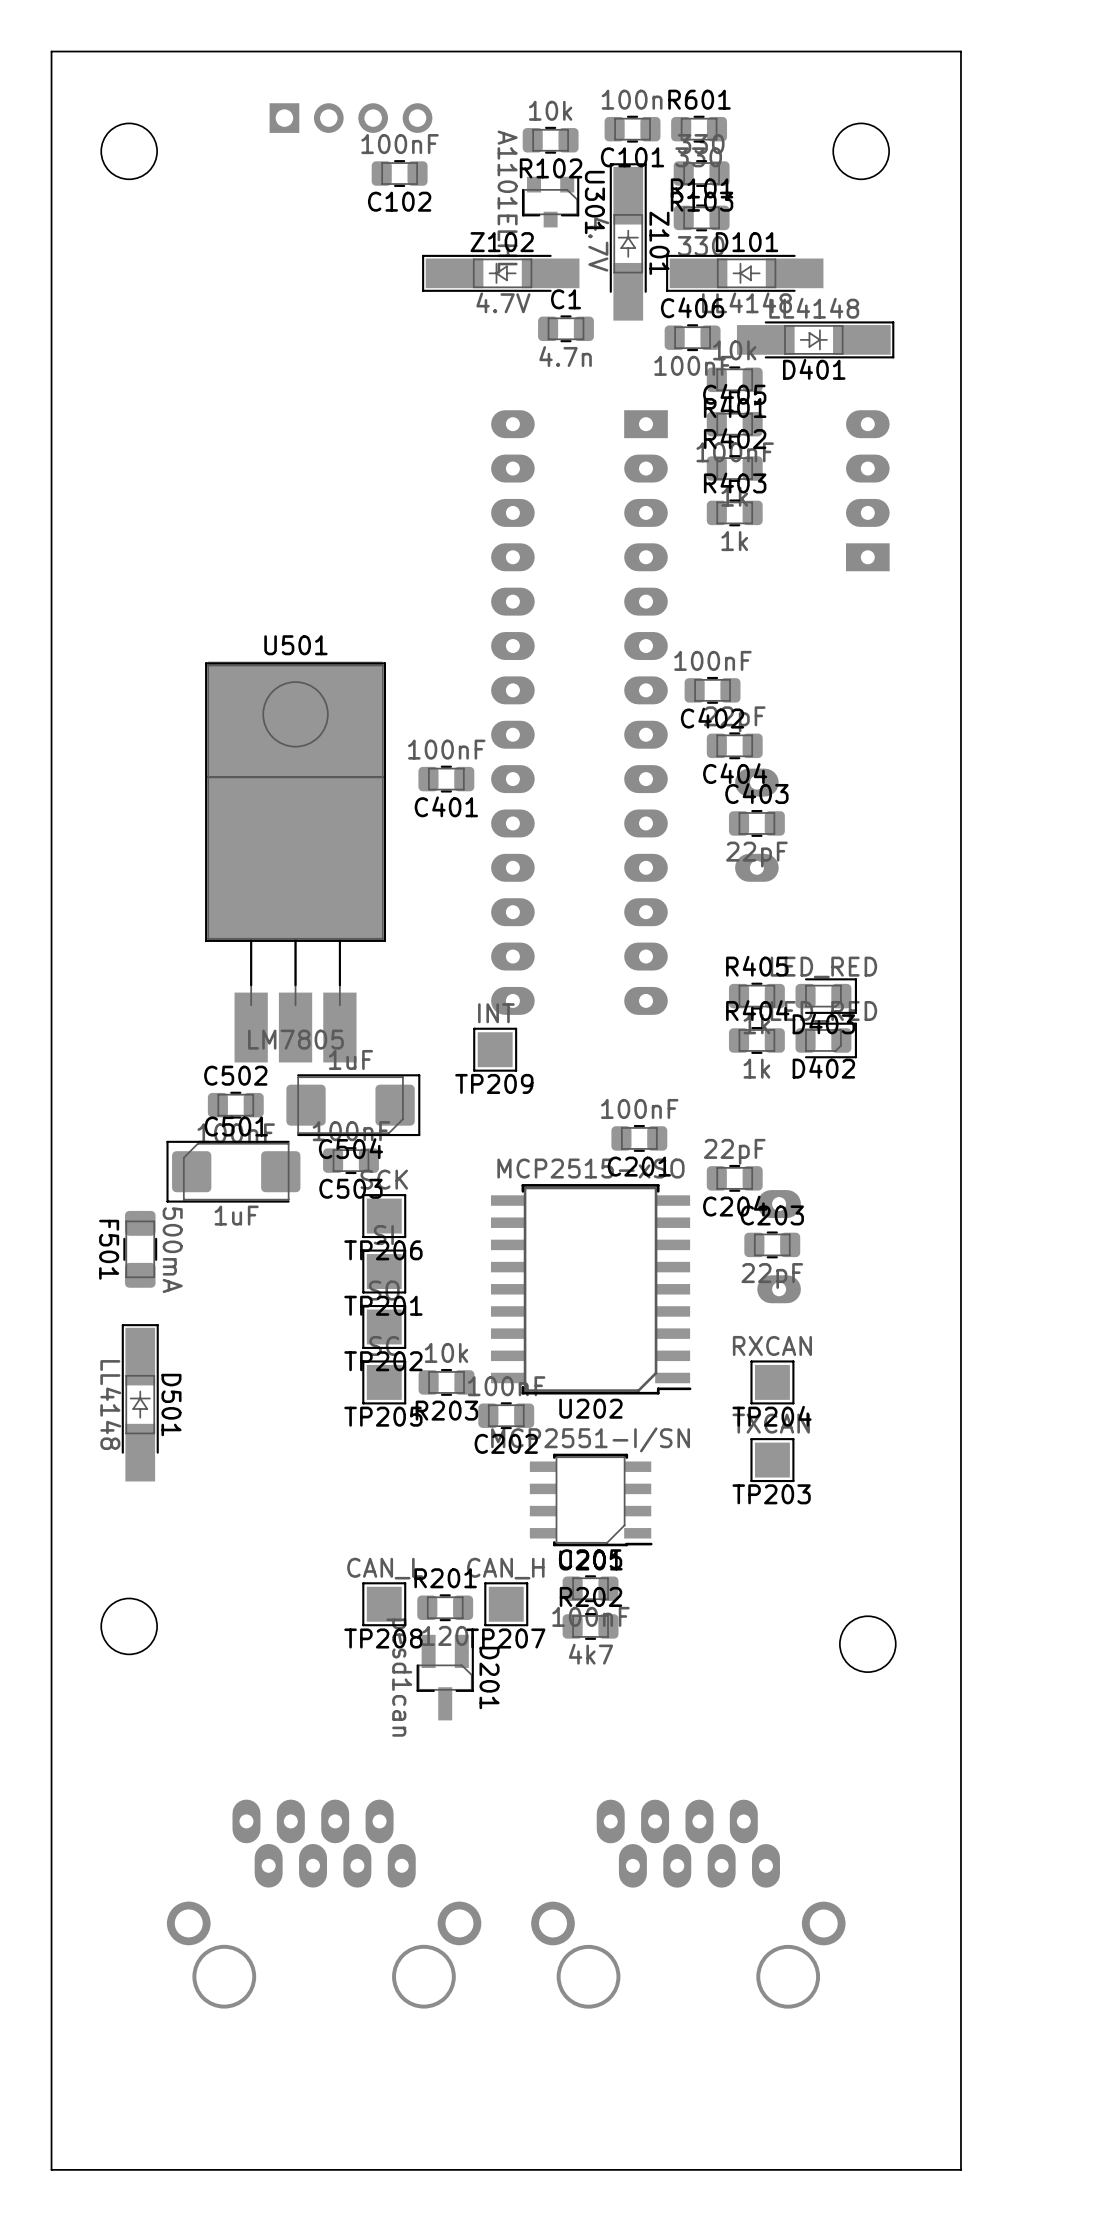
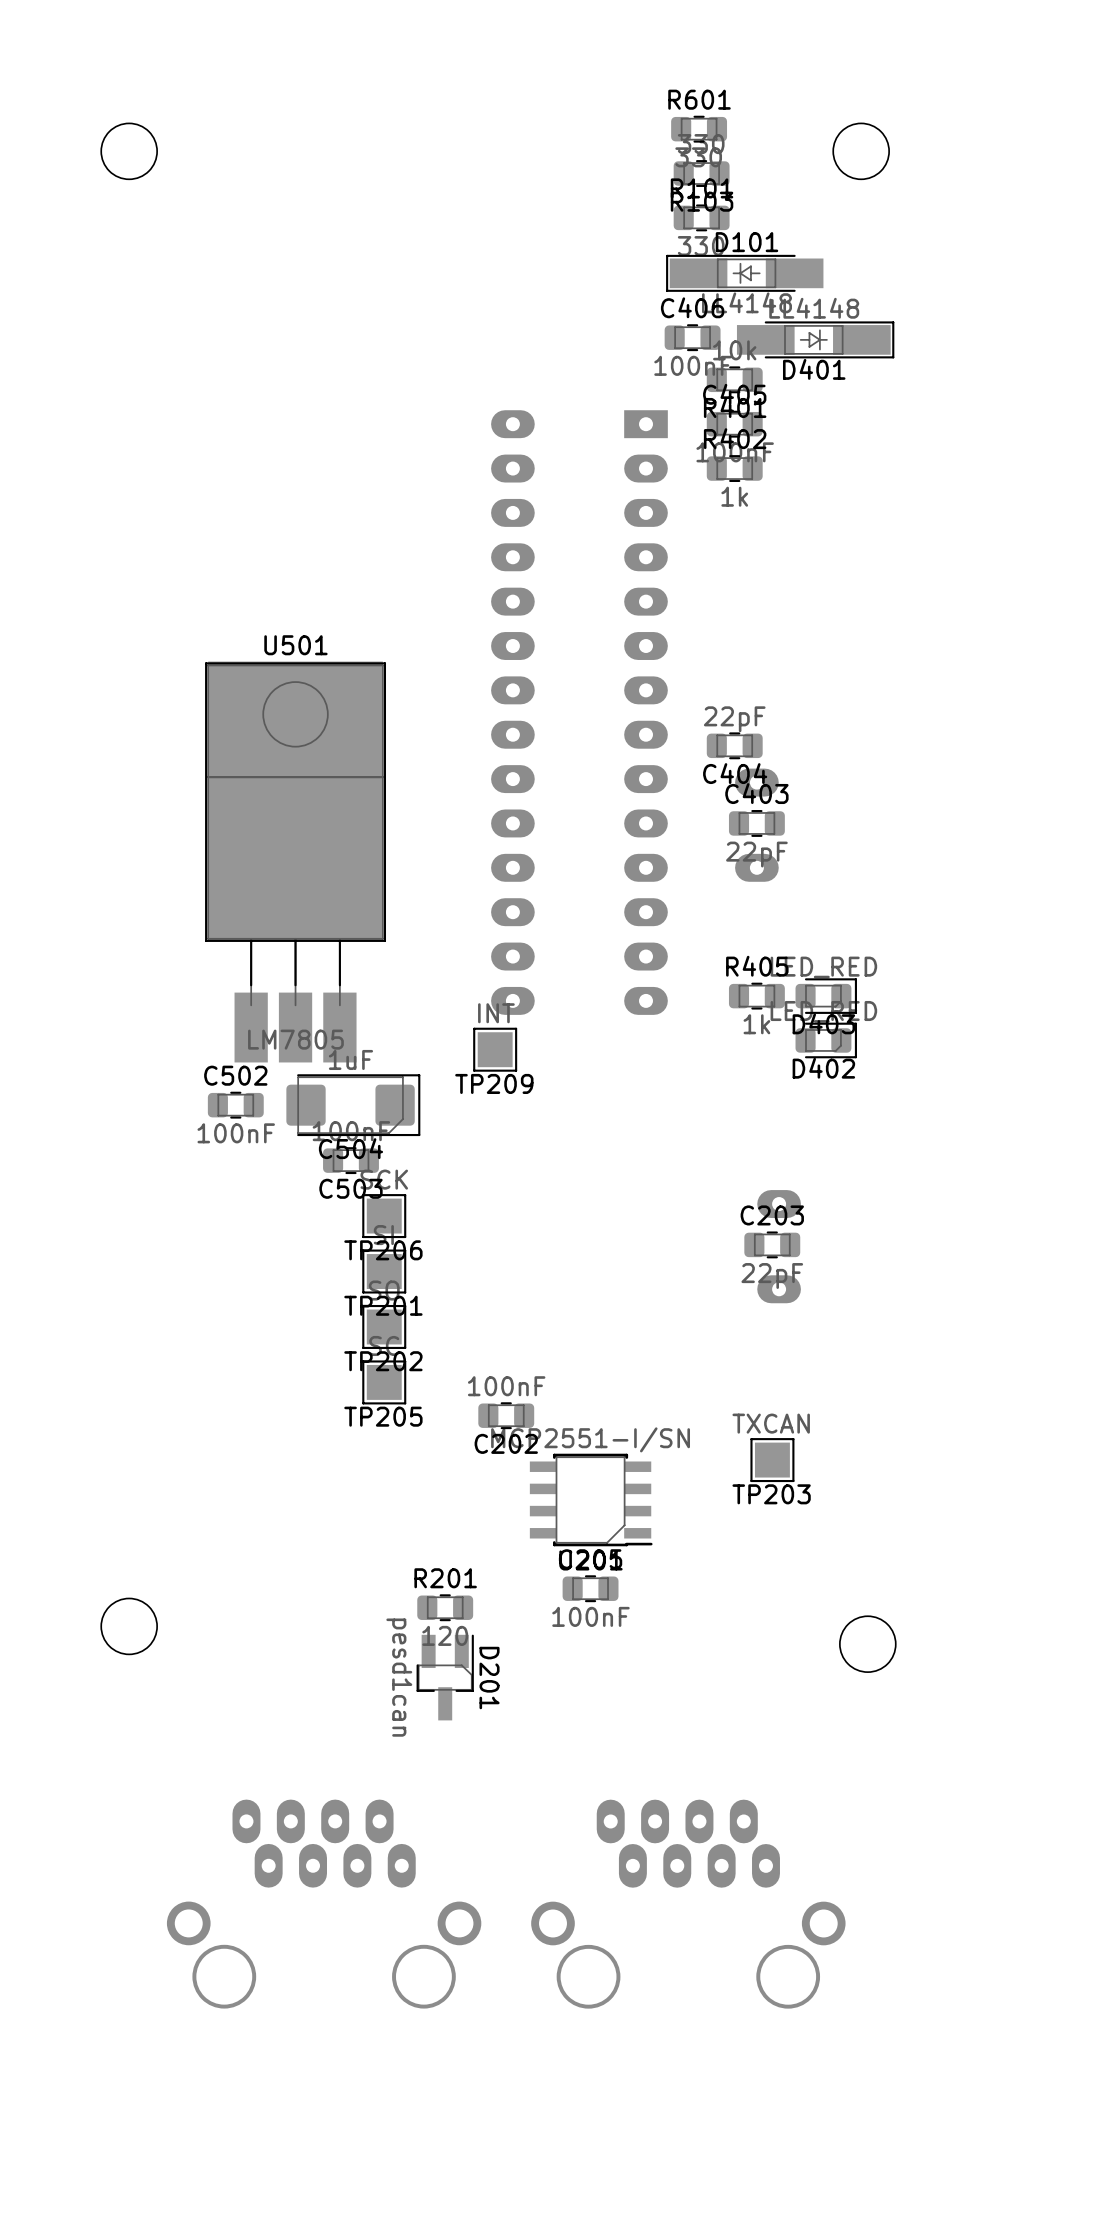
board edge: (960, 51) (51, 51) (51, 2169) (960, 2169) (960, 51) -> none
part: (350, 118) -> none
C101: 100n (632, 129) -> none
R102: 10k (550, 140) -> none
C102: 100nF (399, 173) -> none
U301: A1101ELHL (550, 202) -> none
Z101: 4.7V (628, 241) -> none
Z102: 4.7V (500, 273) -> none
C1: 4.7n (565, 328) -> none
part: (867, 490) -> none
R403: 1k (734, 512) -> none
C402: 100nF (712, 690) -> none
C401: 100nF (446, 779) -> none
R404: 1k (756, 1040) -> none
C201: 100nF (639, 1138) -> none
C501: 1uF (233, 1171) -> none
C204: 22pF (734, 1178) -> none
F501: 500mA (140, 1249) -> none
U202: MCP2515-xSO (591, 1289) -> none
R203: 10k (446, 1382) -> none
TP204: RXCAN (772, 1382) -> none
D501: LL4148 (140, 1402) -> none
TP208: CAN_L (384, 1604) -> none
TP207: CAN_H (506, 1604) -> none
R202: 4k7 (590, 1626) -> none

